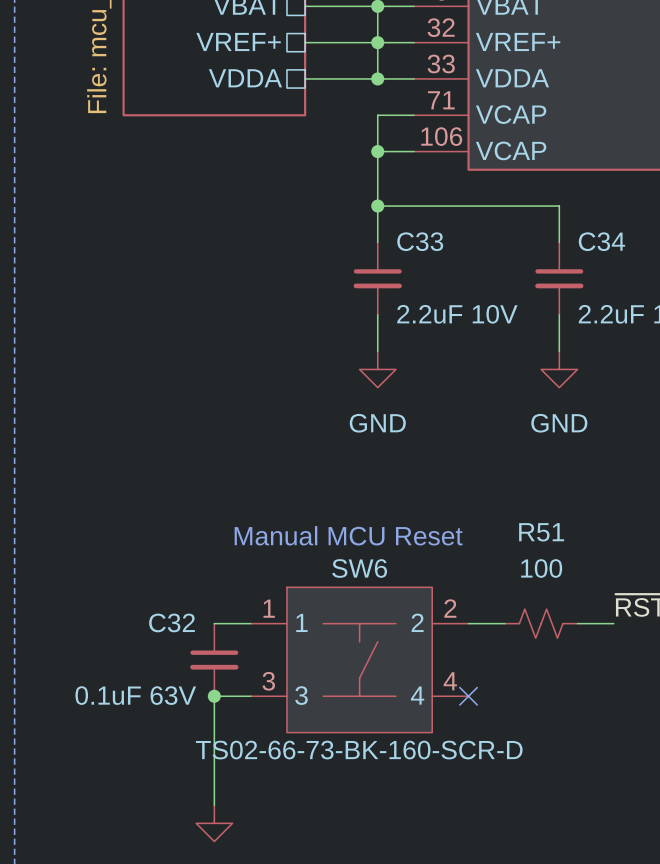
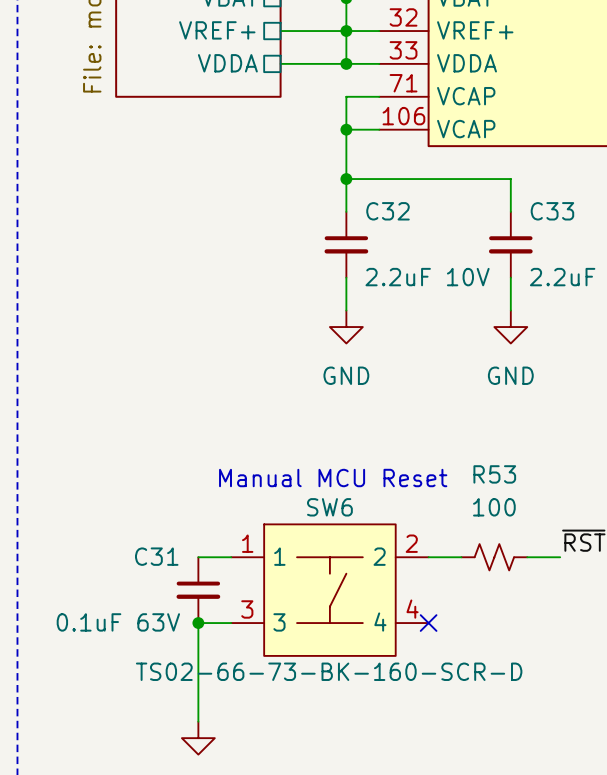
C33 name: C33 (420, 241) -> C32 (388, 211)
C34 name: C34 (601, 241) -> C33 (552, 211)
R51 name: R51 (541, 532) -> R53 (494, 474)
C32 name: C32 (172, 622) -> C31 (156, 556)

